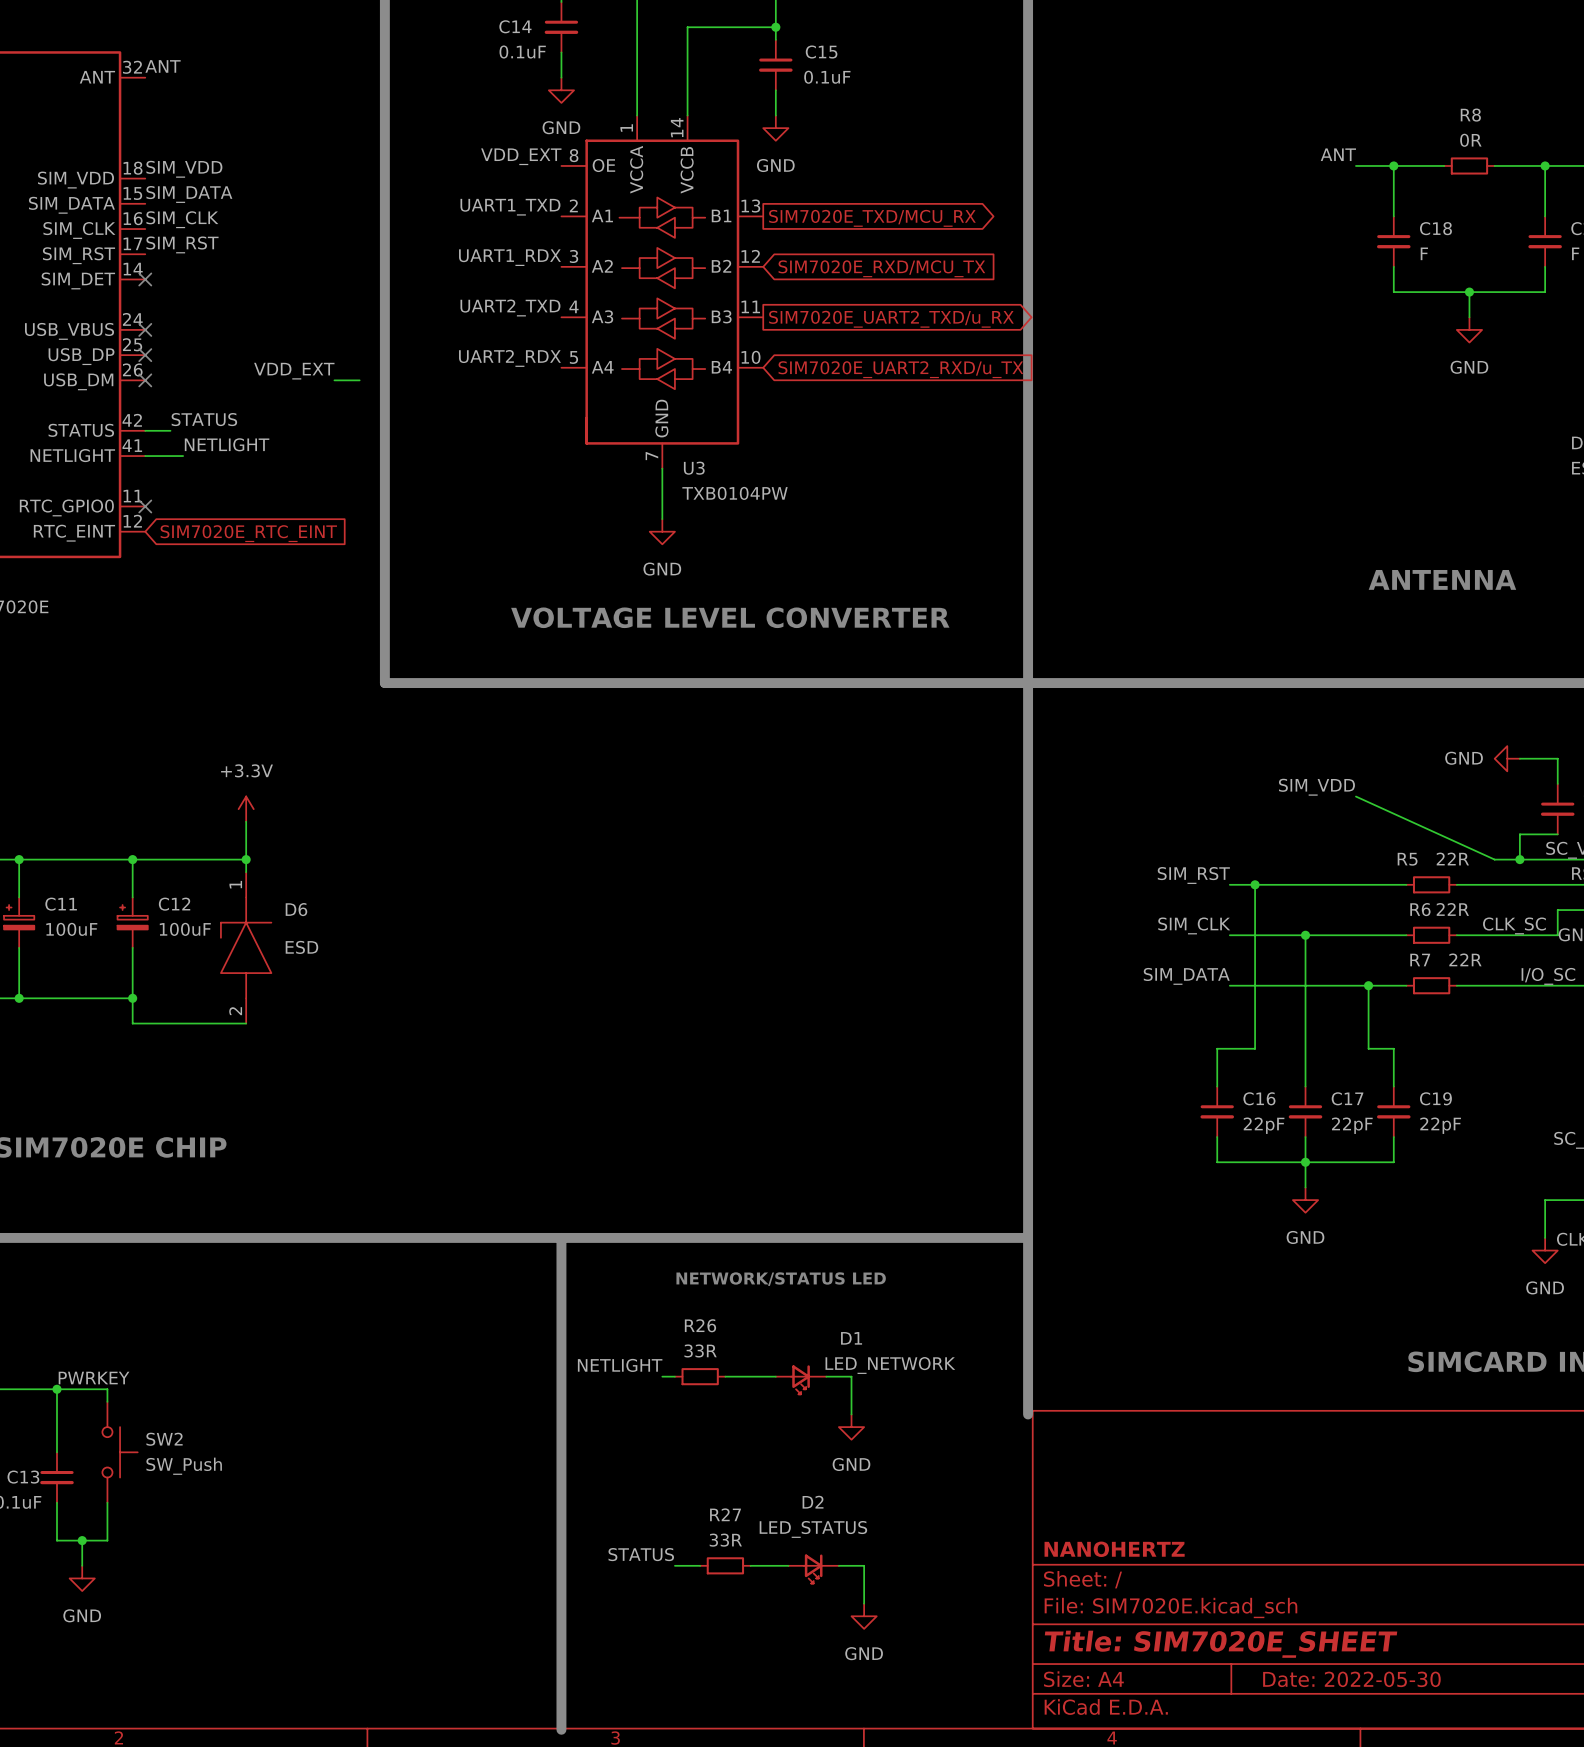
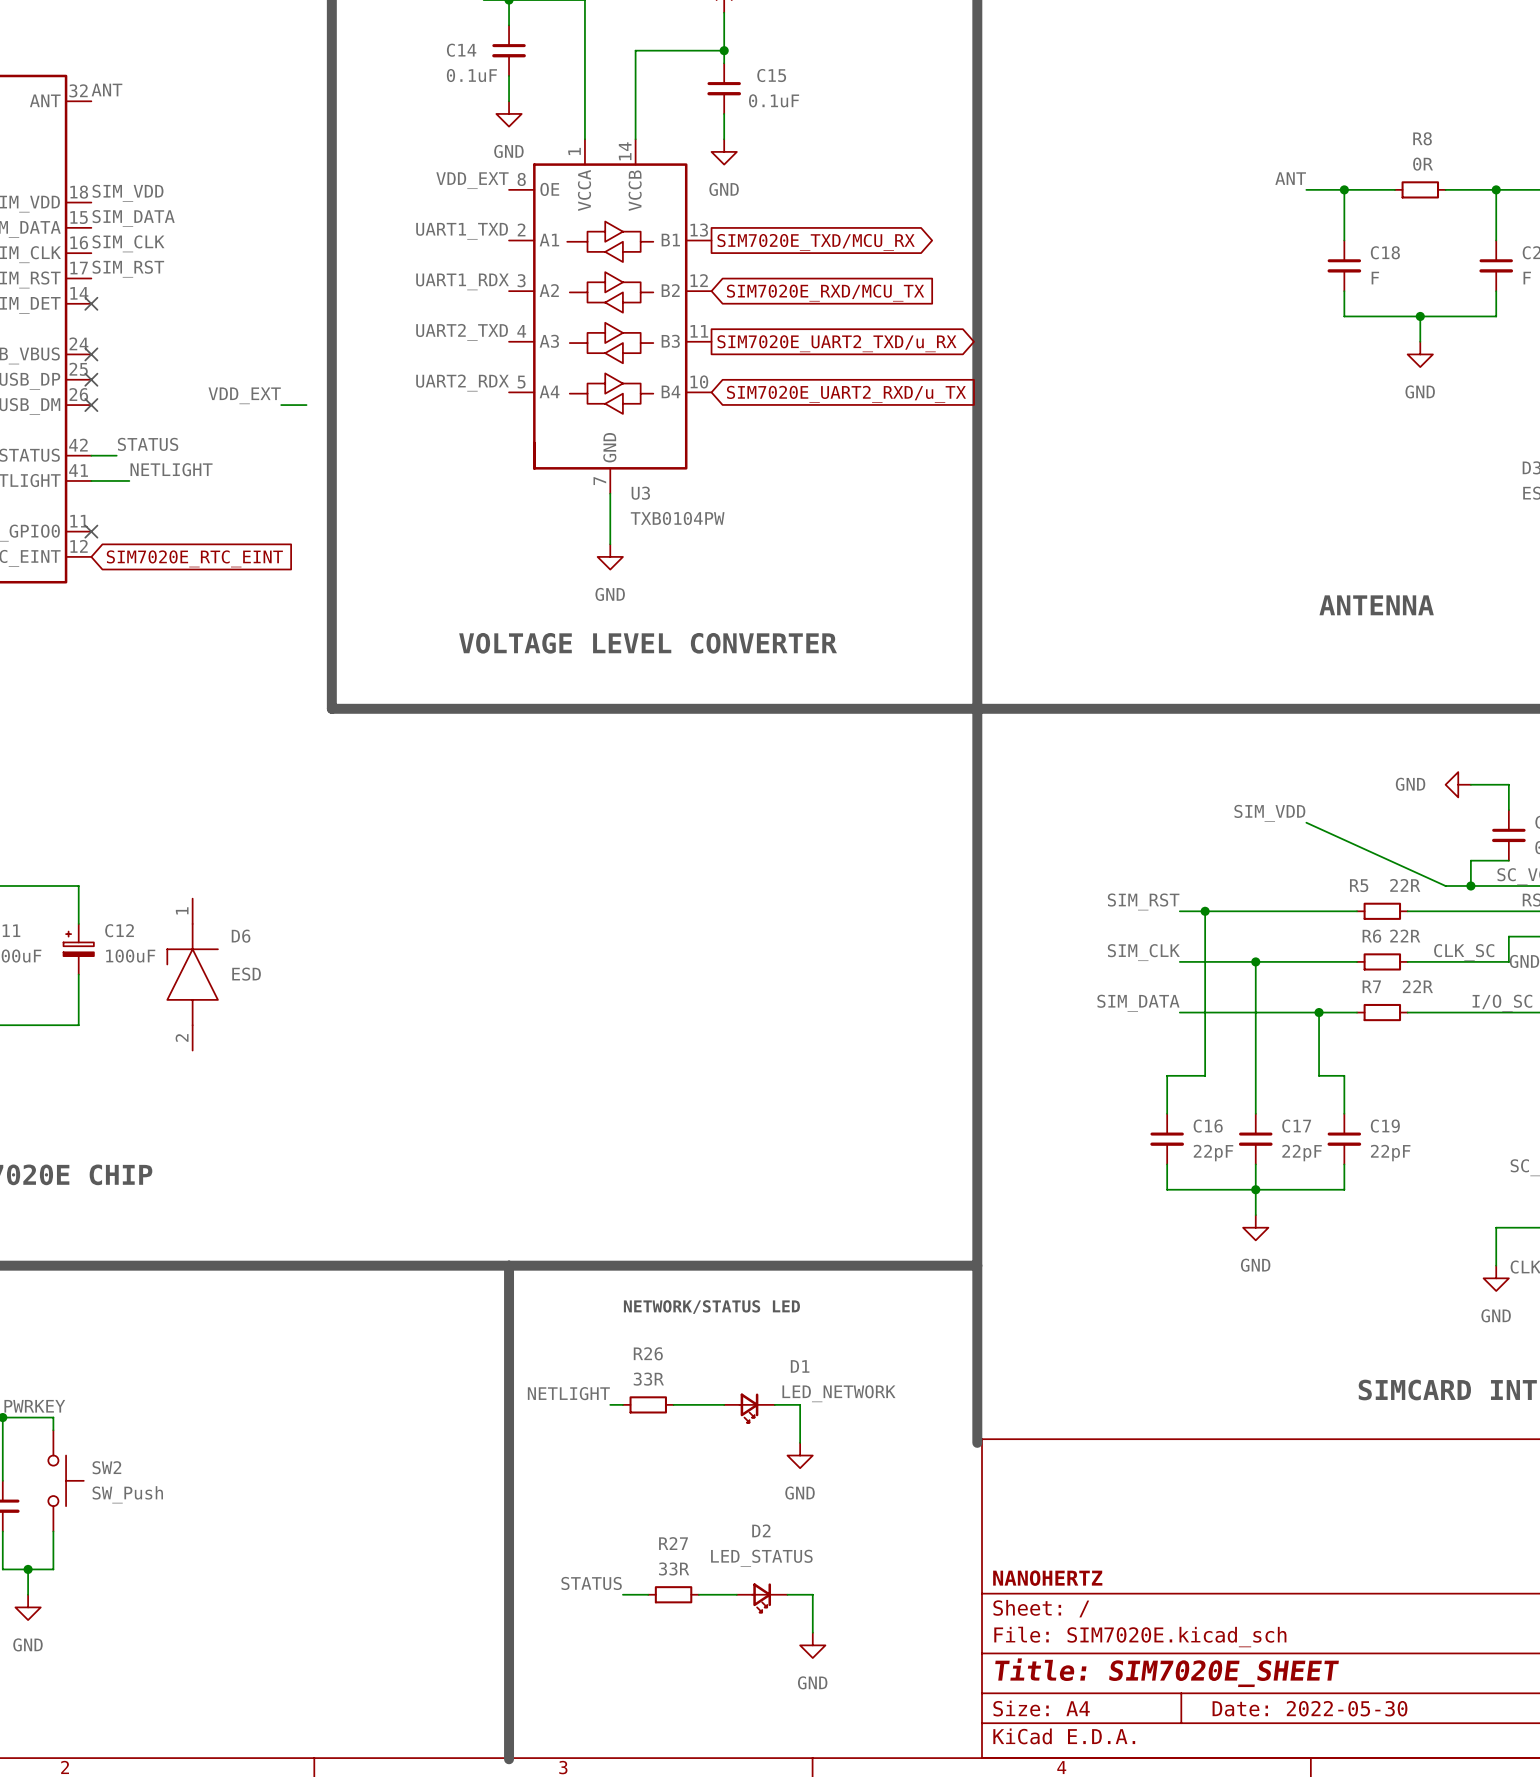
power symbol: +3.3V (246, 809) -> none
wire: (246, 821) (246, 872) -> none
wire: (132, 859) (246, 859) -> none
junction: (132, 859) -> none
junction: (246, 859) -> none
wire: (132, 998) (132, 1023) (246, 1023) -> none
junction: (132, 998) -> none

